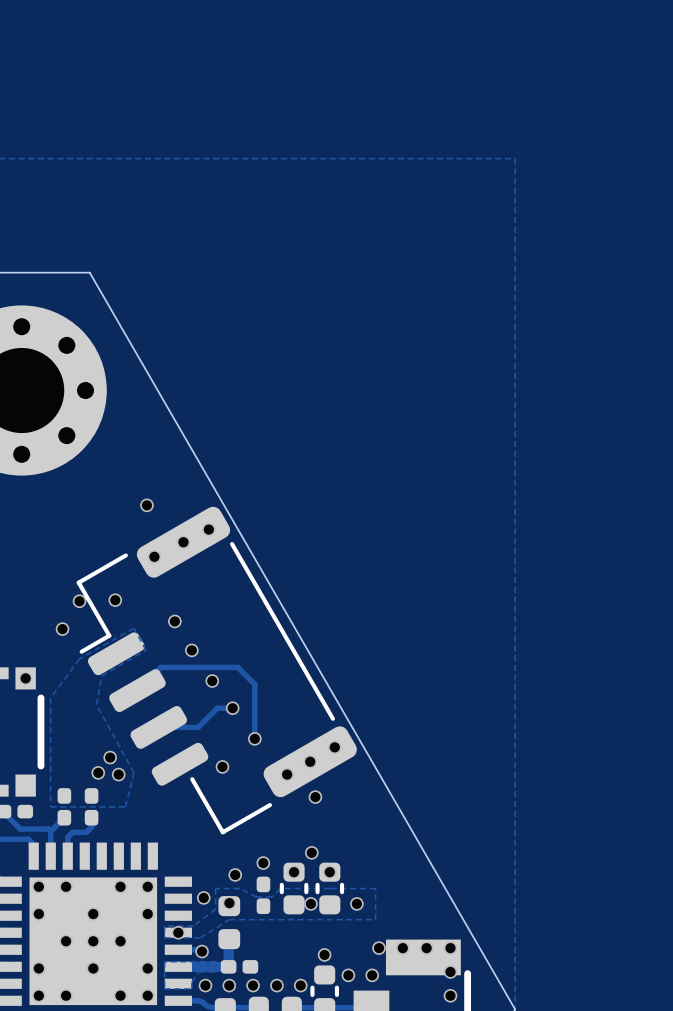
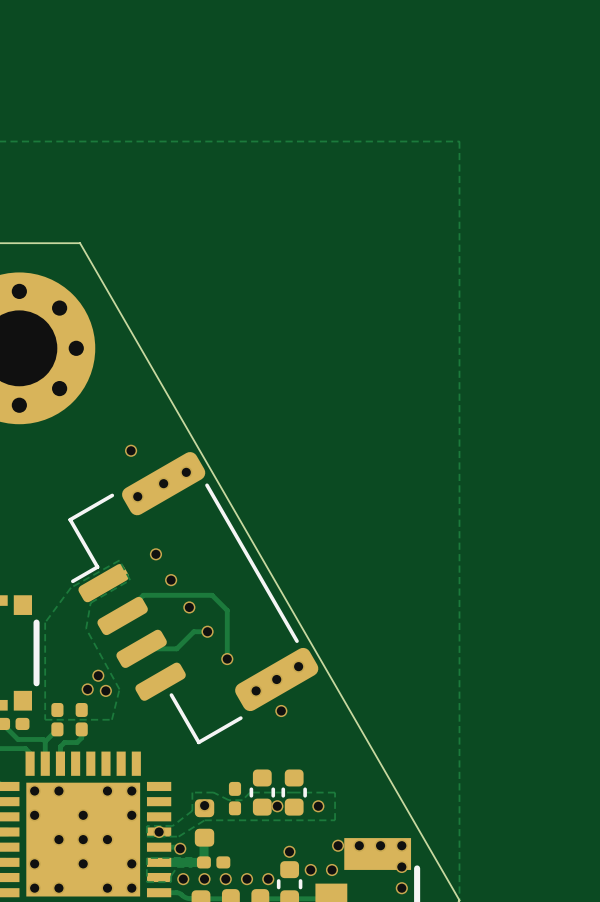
via: (115, 600) -> none
via: (79, 601) -> none
via: (62, 629) -> none
via: (25, 678) -> none
via: (222, 766) -> none
via: (311, 852) -> none
via: (263, 863) -> none
via: (294, 872) -> none
via: (329, 872) -> none
via: (235, 874) -> none
via: (203, 897) -> none

